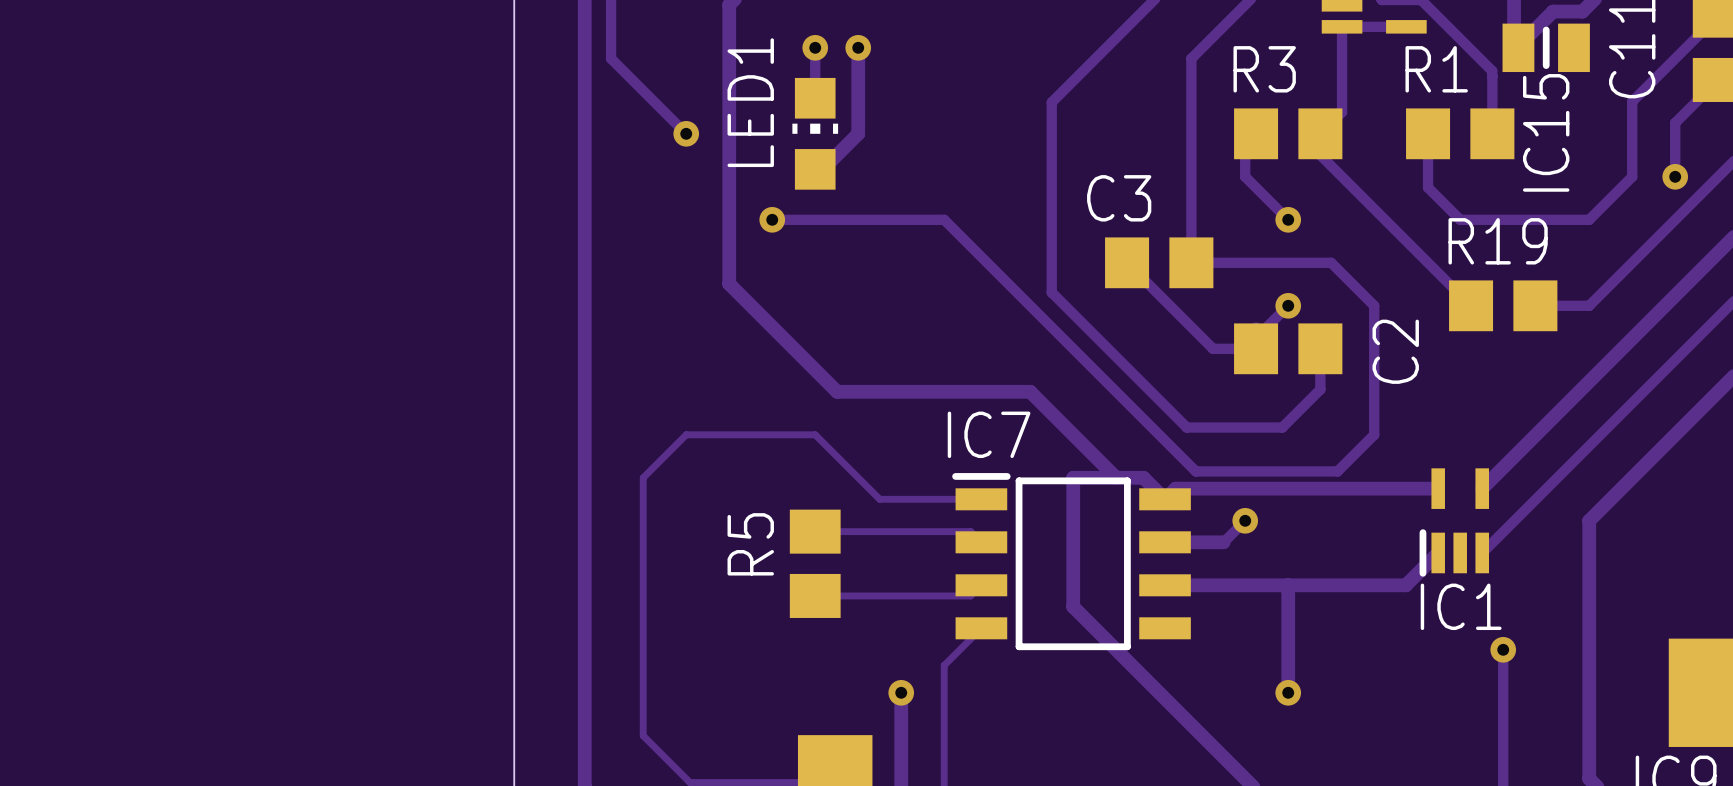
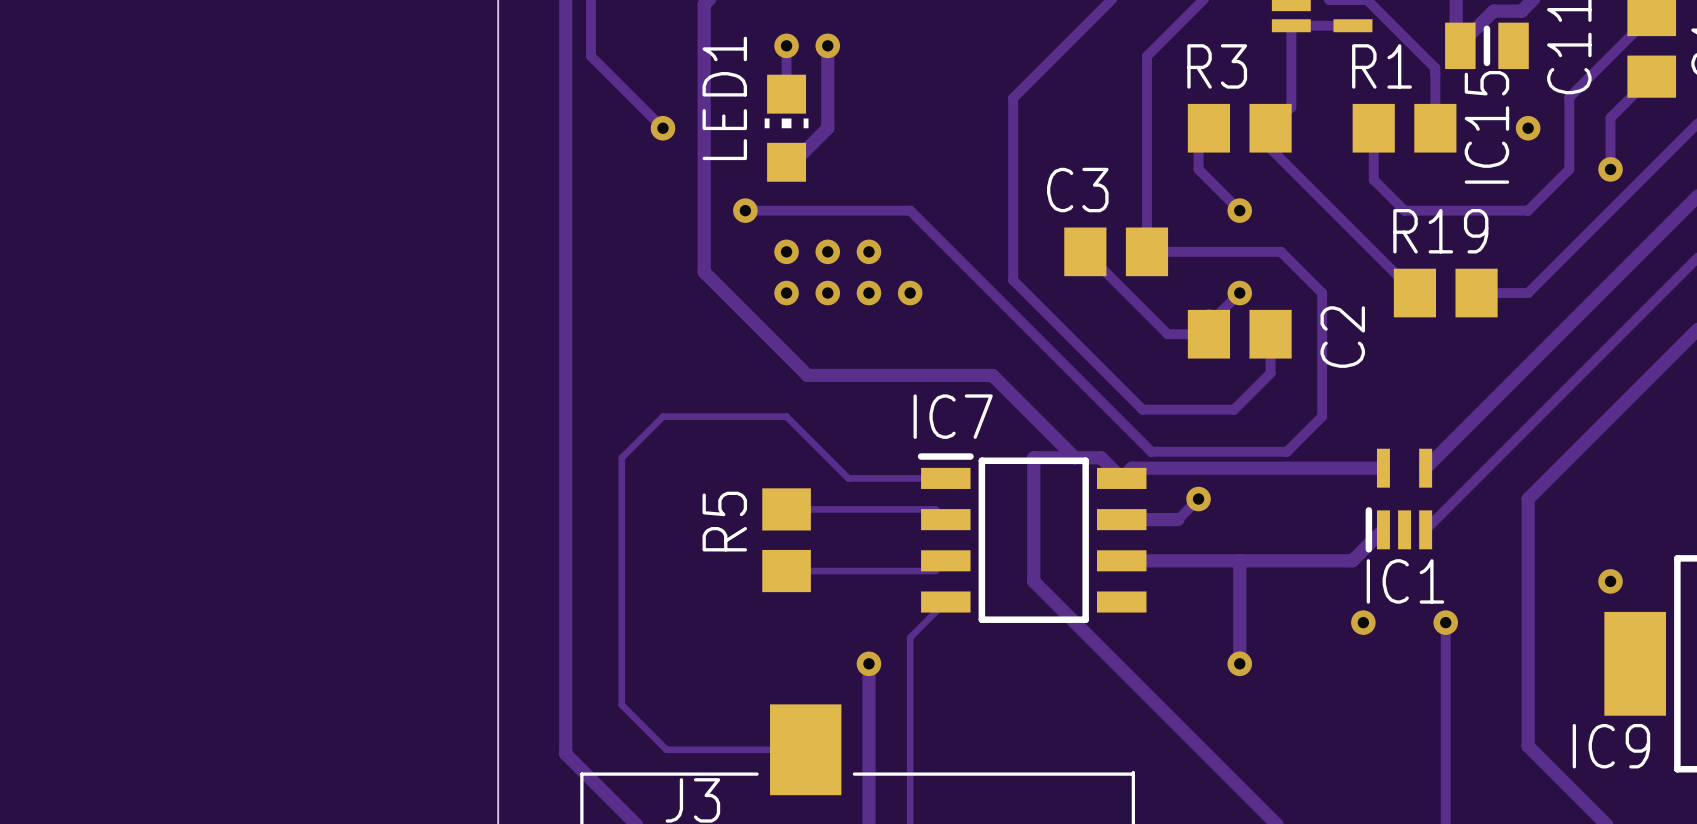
via: none -> (1528, 128)
via: none -> (786, 251)
via: none -> (827, 251)
via: none -> (868, 251)
via: none -> (786, 293)
via: none -> (827, 293)
via: none -> (868, 293)
via: none -> (910, 293)
via: none -> (1610, 581)
via: none -> (1363, 622)

